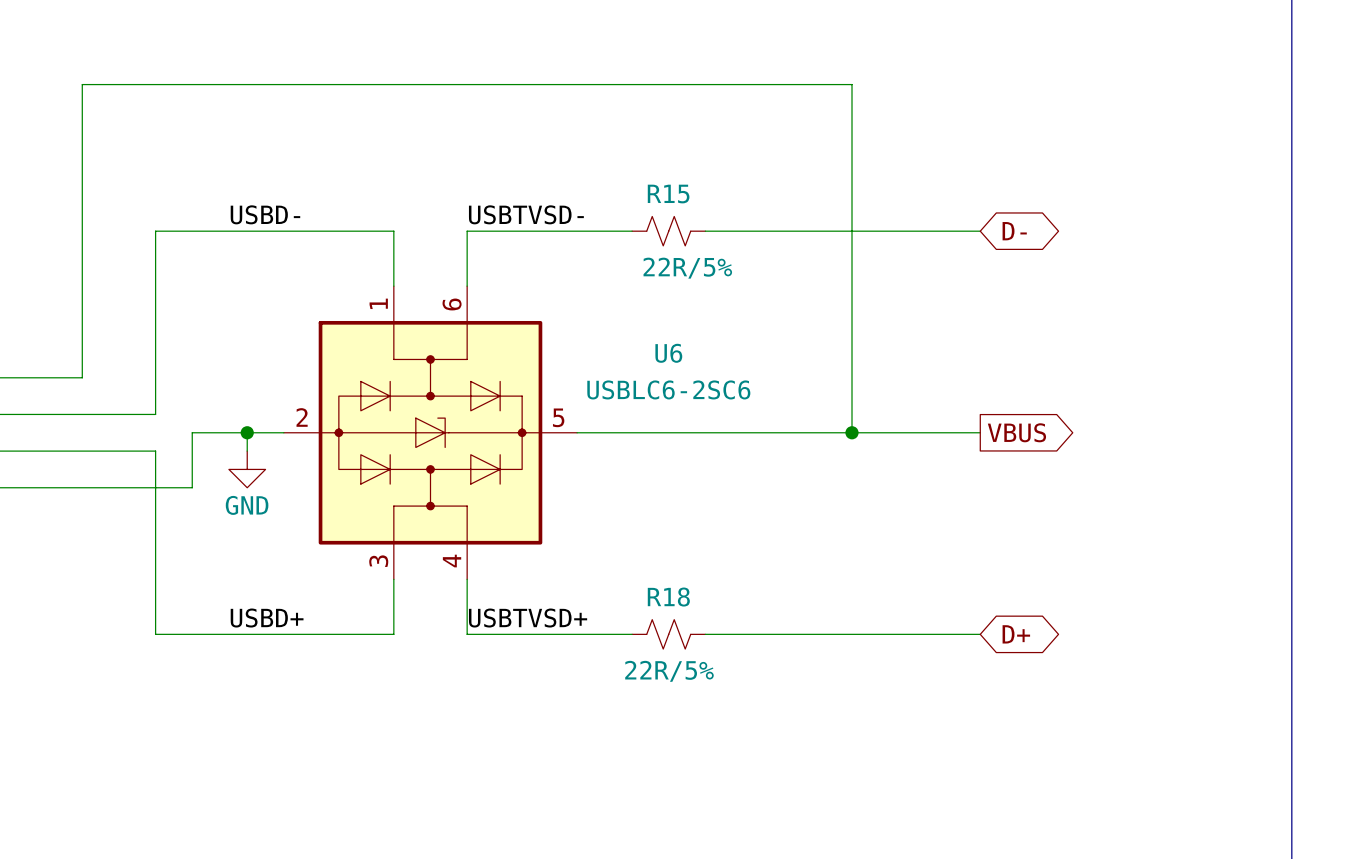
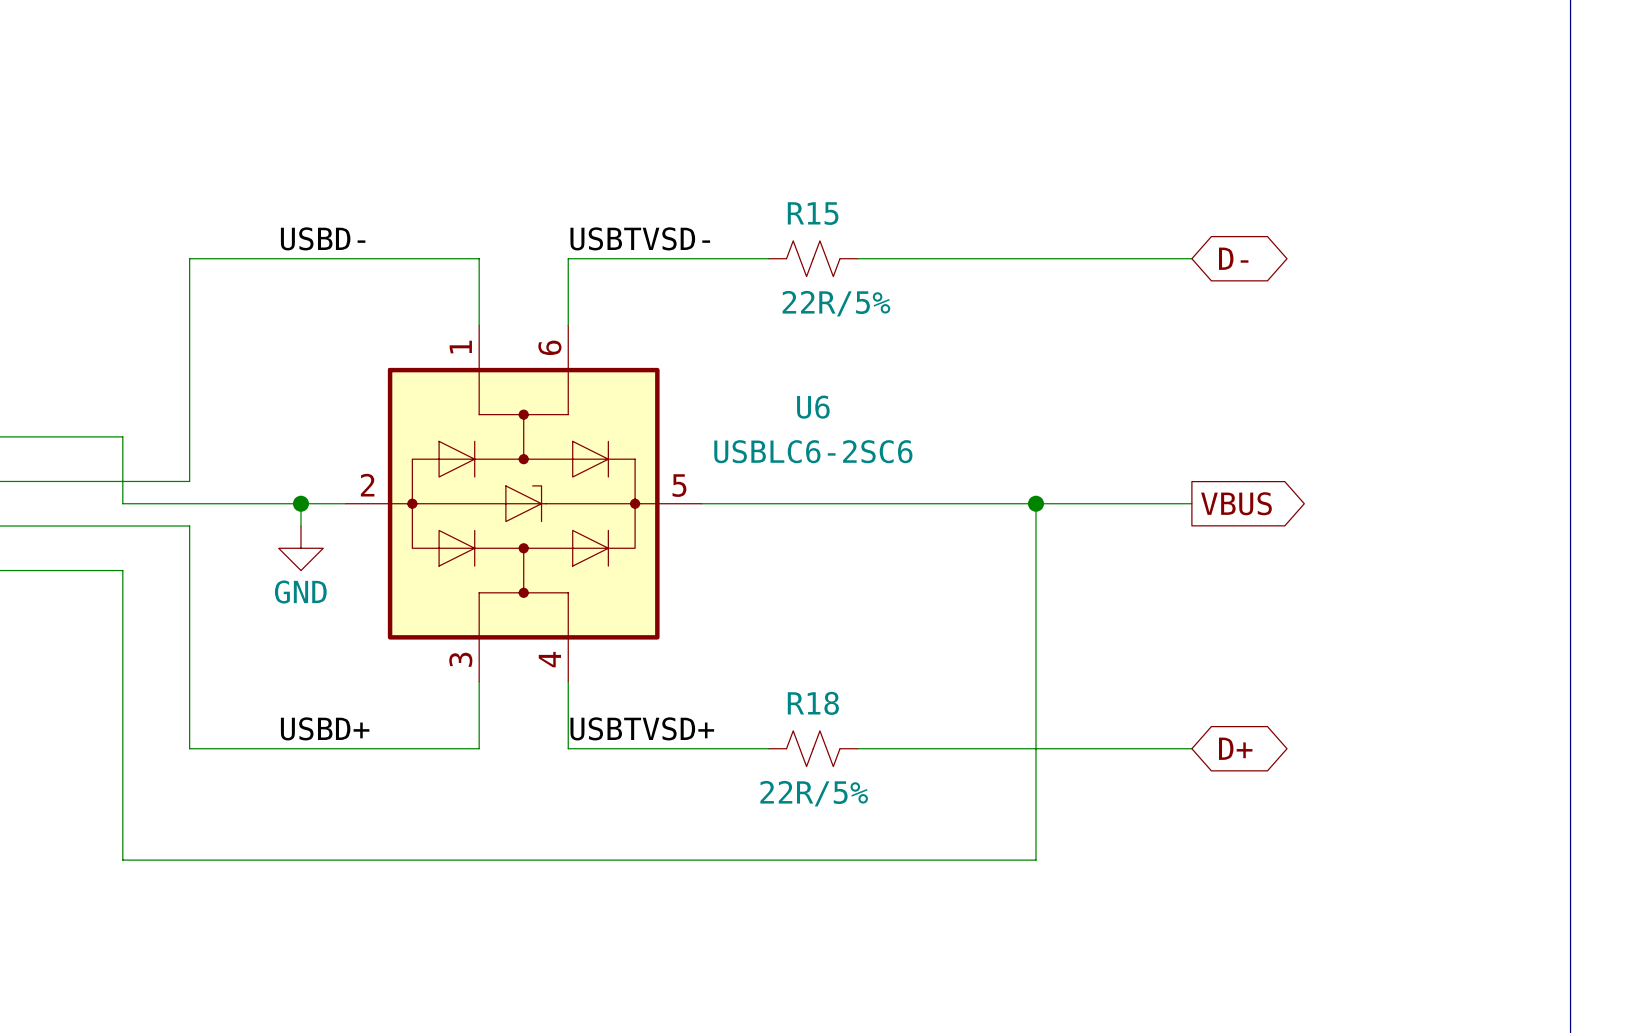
wire: (82, 377) (82, 84) (852, 84) (852, 432) -> (122, 570) (122, 860) (1035, 860) (1035, 503)
wire: (192, 432) (192, 487) (100, 487) -> (234, 503) (122, 503) (122, 436) (100, 436)

